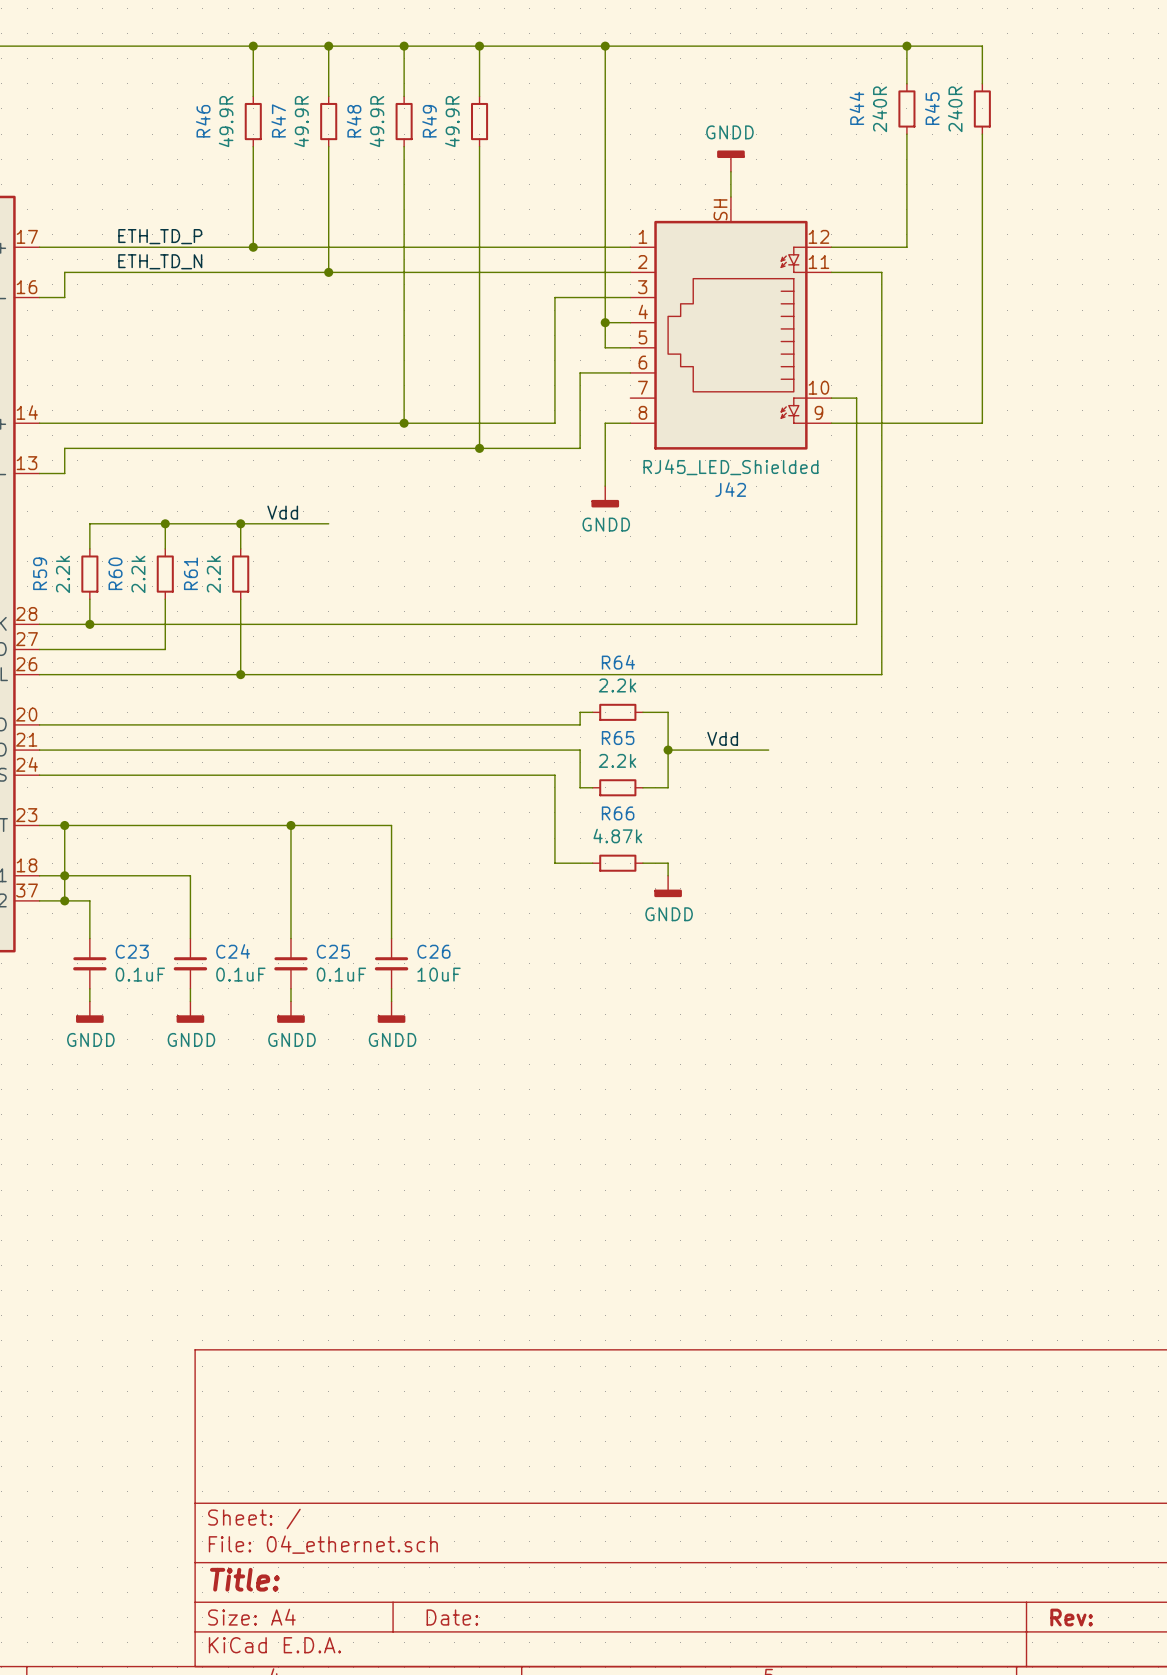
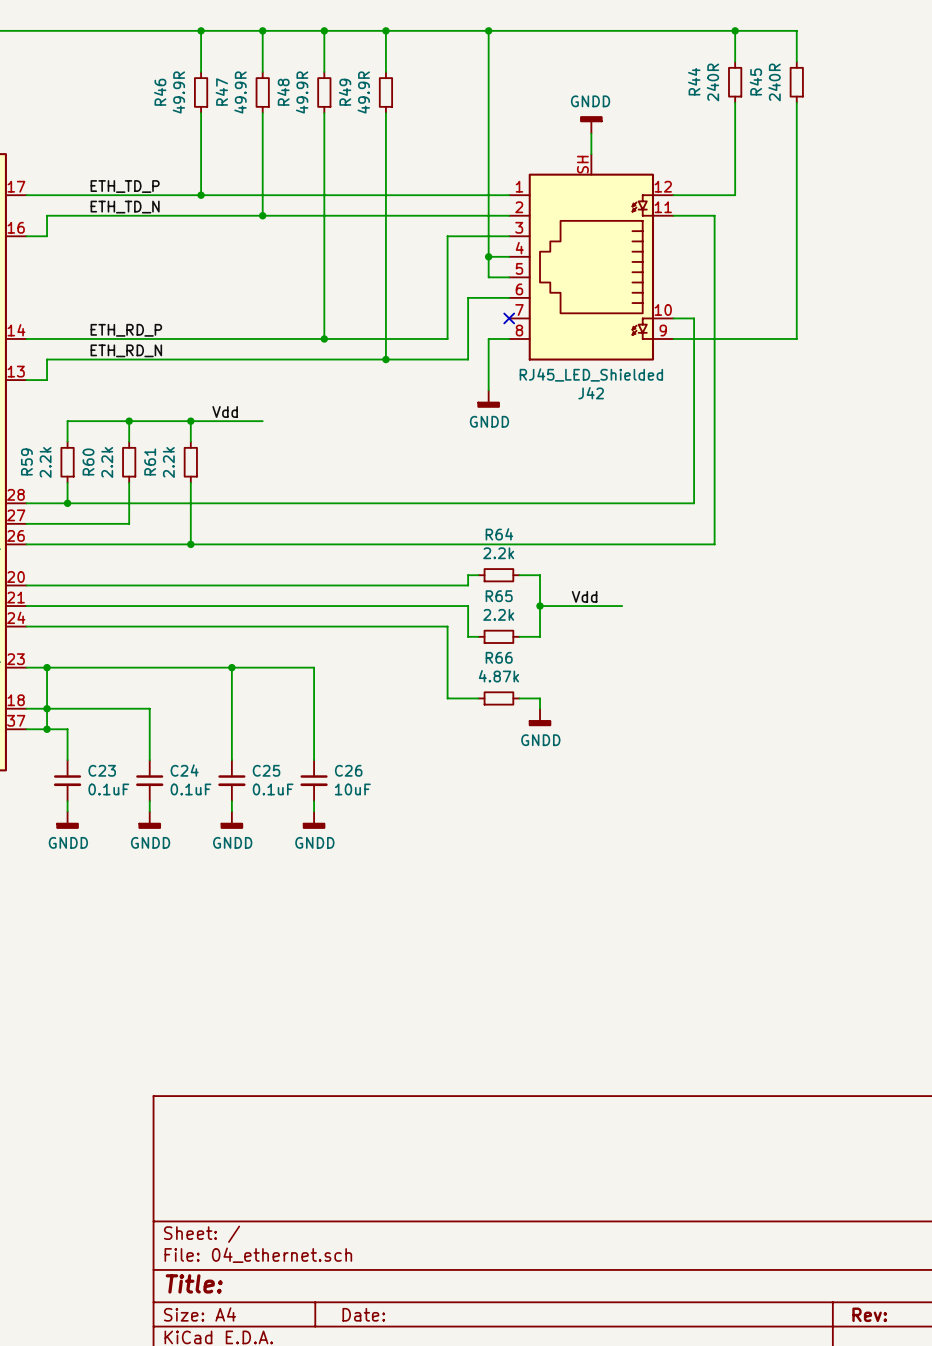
no-connect mark: none -> (509, 318)
label: none -> ETH_RD_P (126, 330)
label: none -> ETH_RD_N (126, 350)

